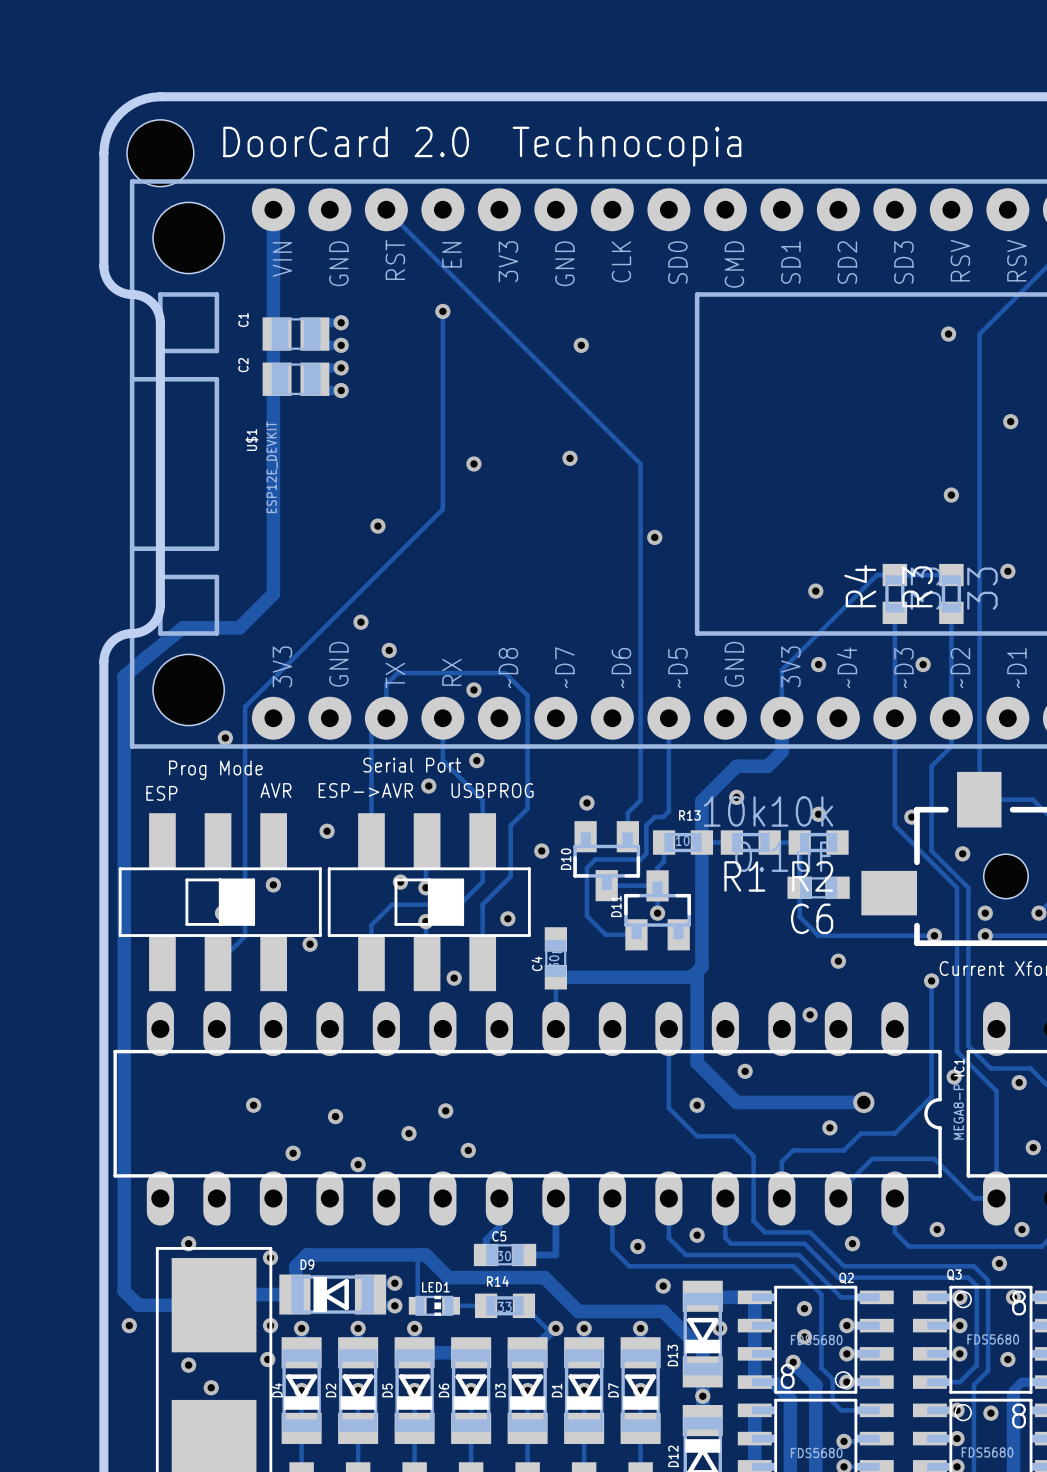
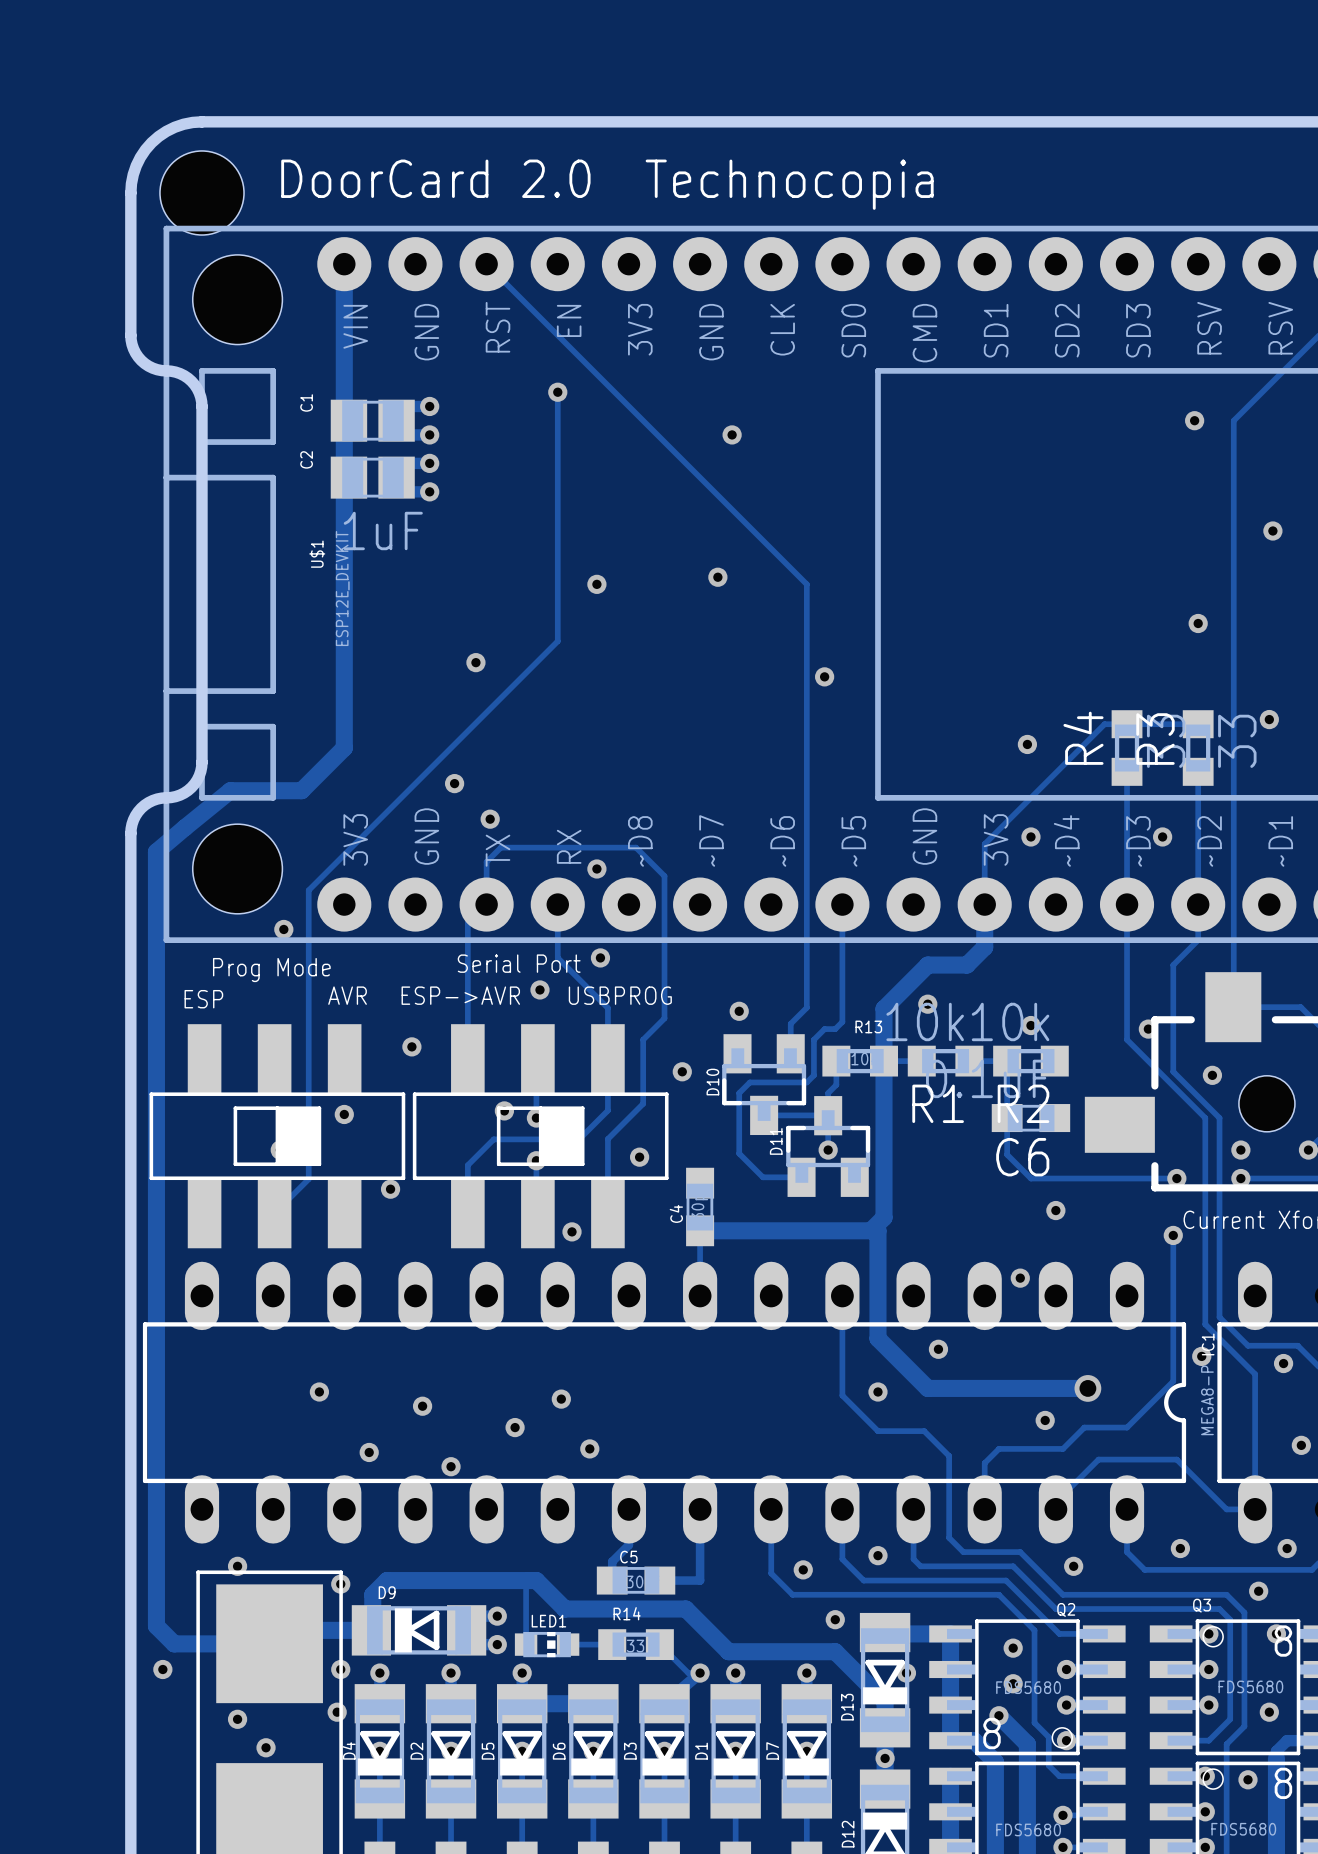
C2 value: none -> 1uF (383, 530)

